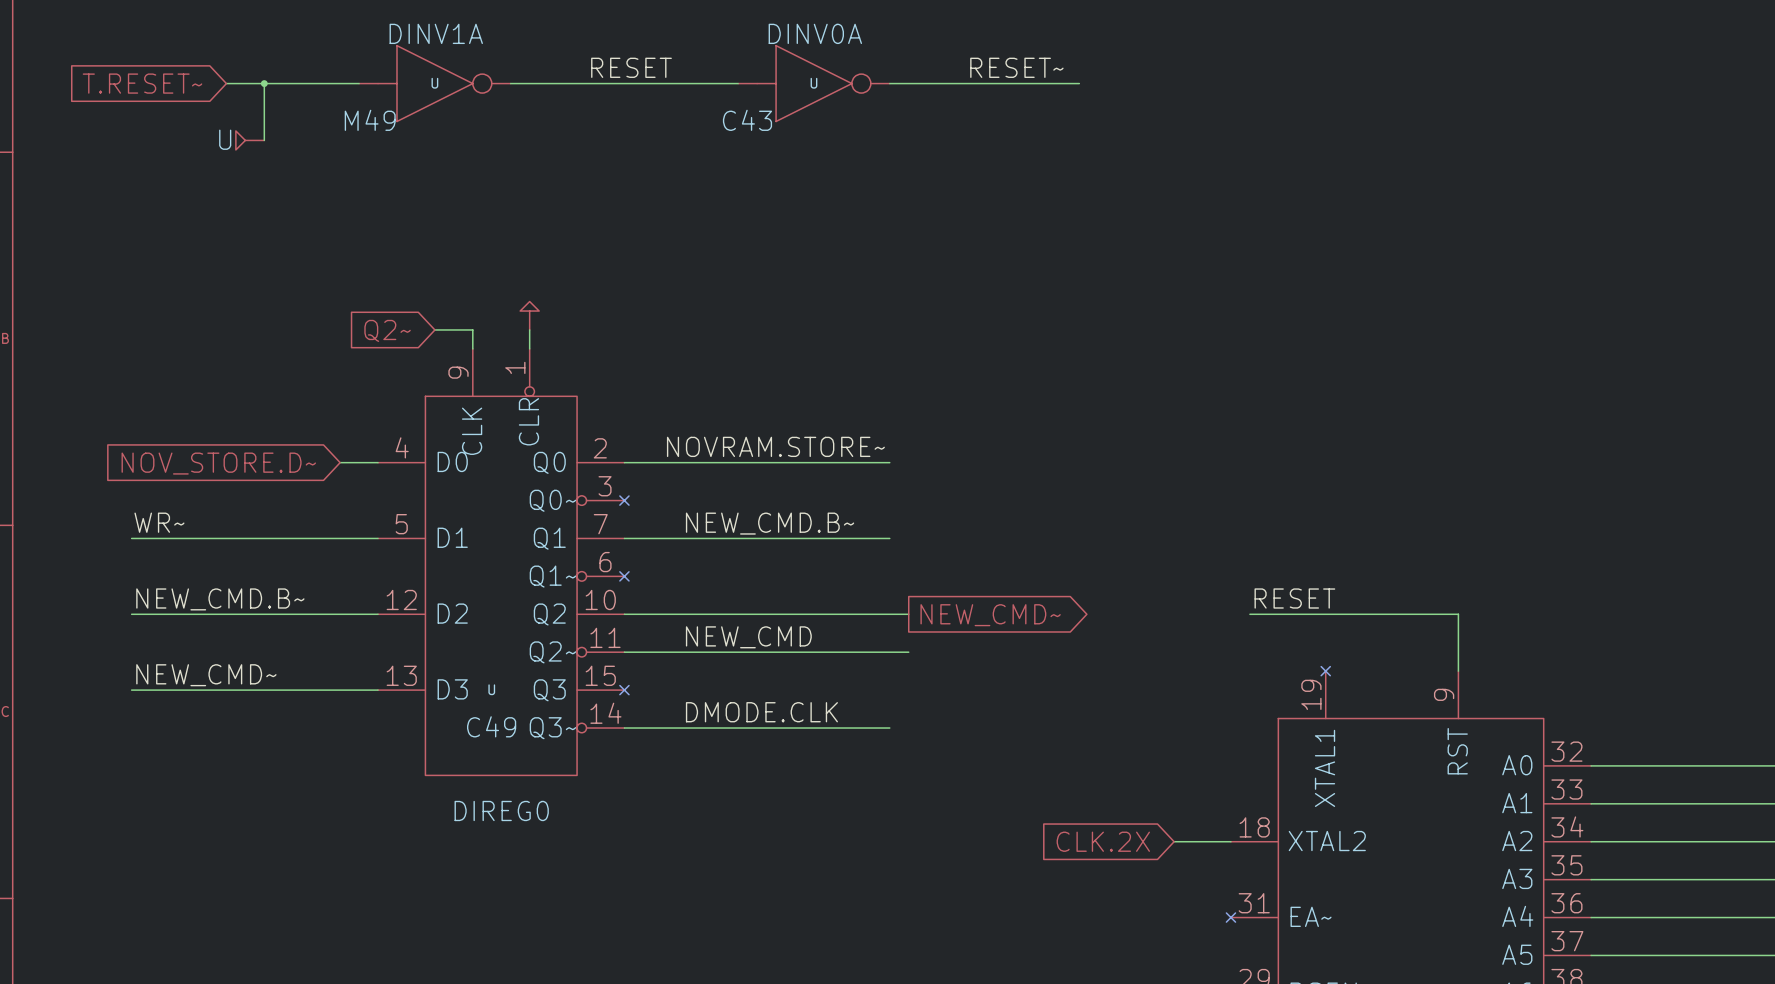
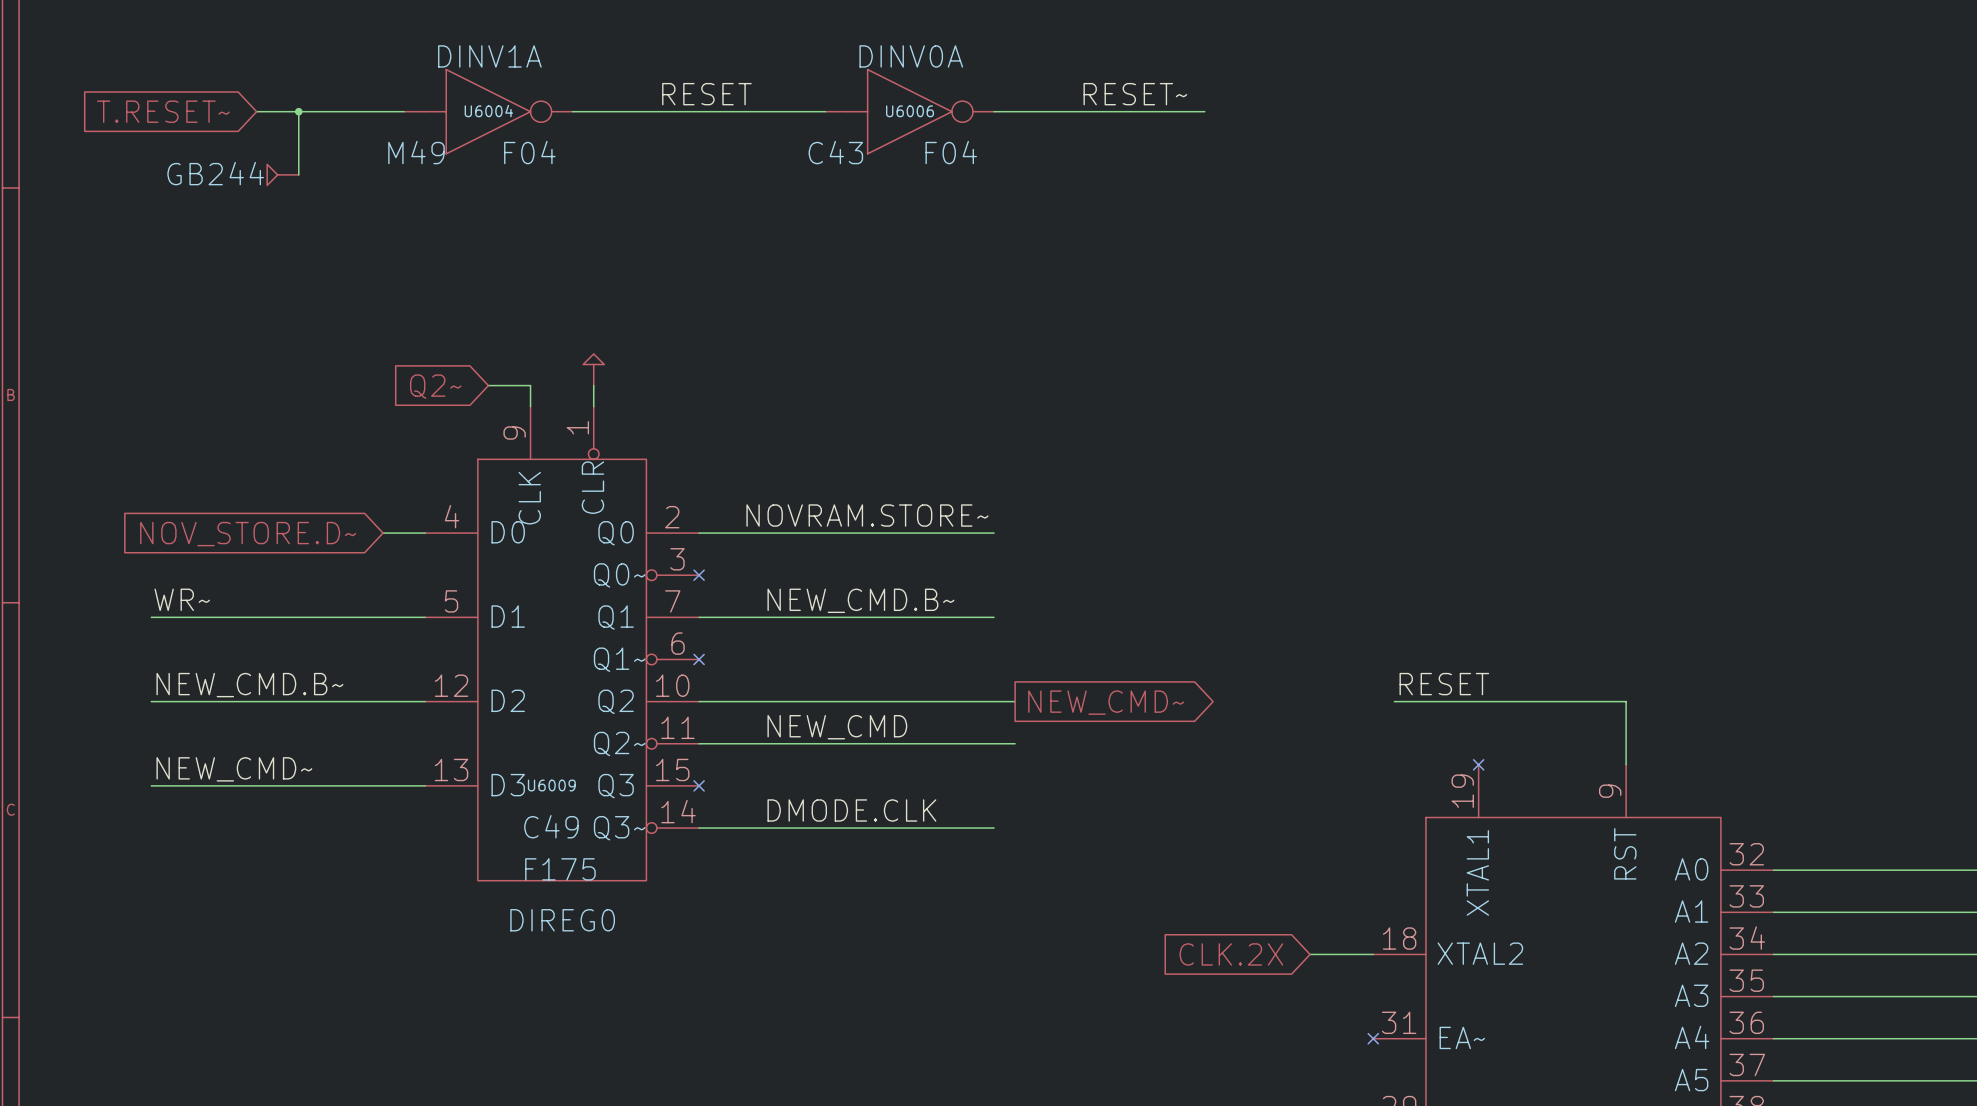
U name: U (434, 83) -> U6004 (488, 111)
U name: U (813, 83) -> U6006 (910, 111)
U value: none -> F04 (529, 152)
U value: none -> F04 (951, 152)
U name: U (225, 139) -> GB244 (215, 173)
U name: U (491, 689) -> U6009 (551, 785)
U value: none -> F175 (560, 869)

